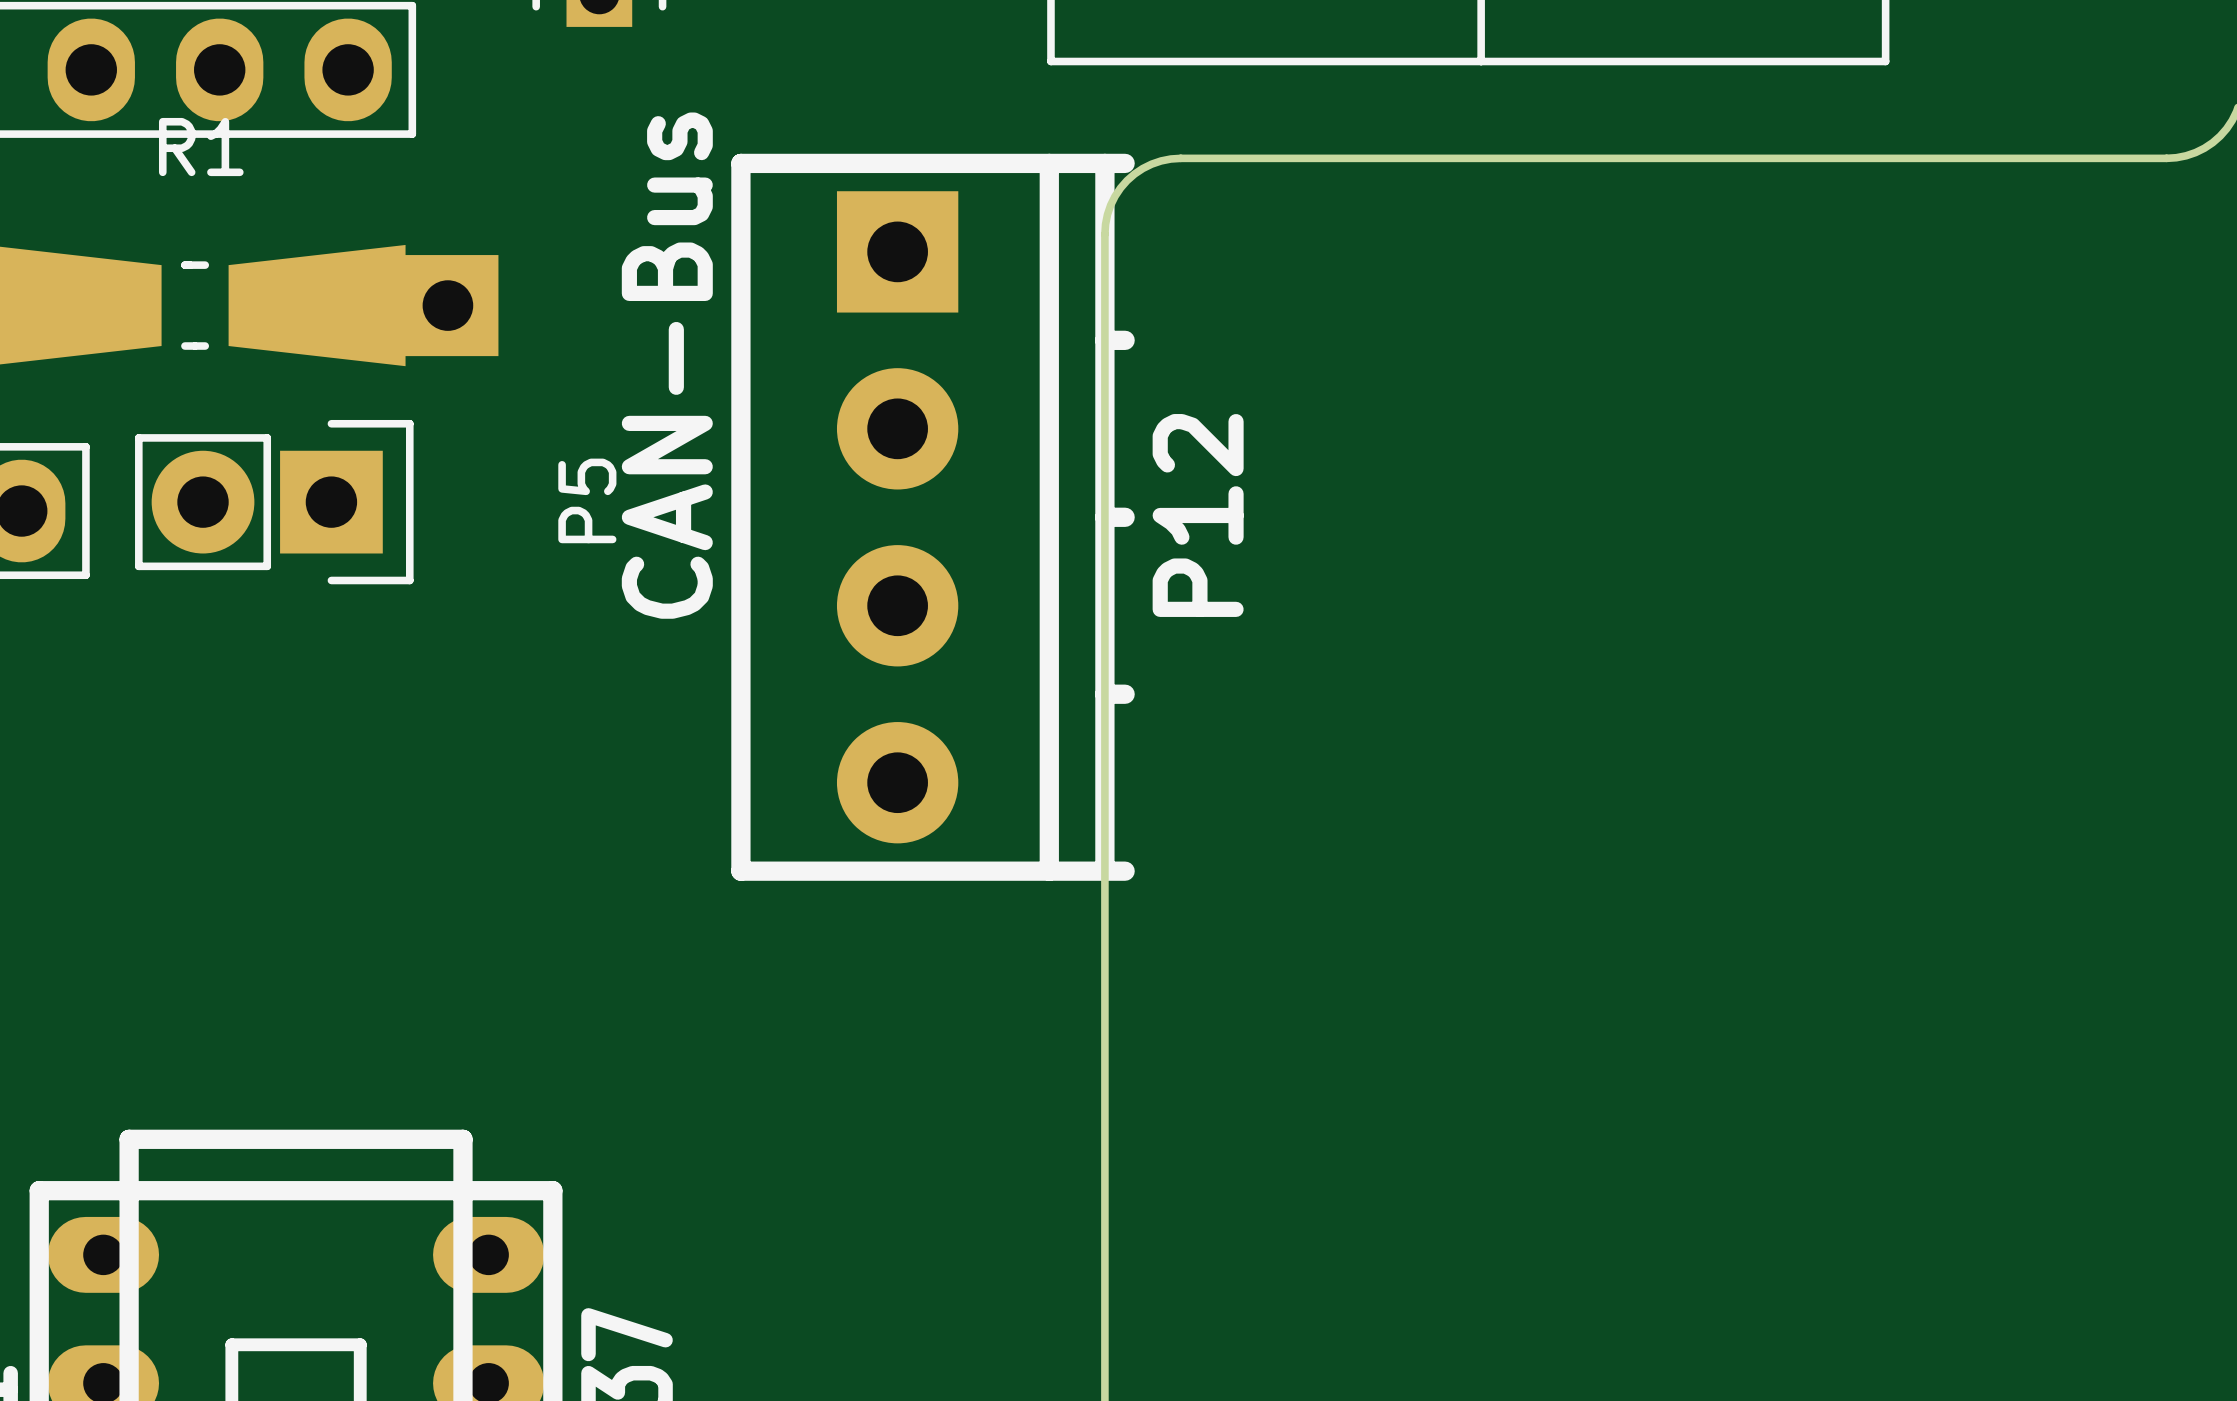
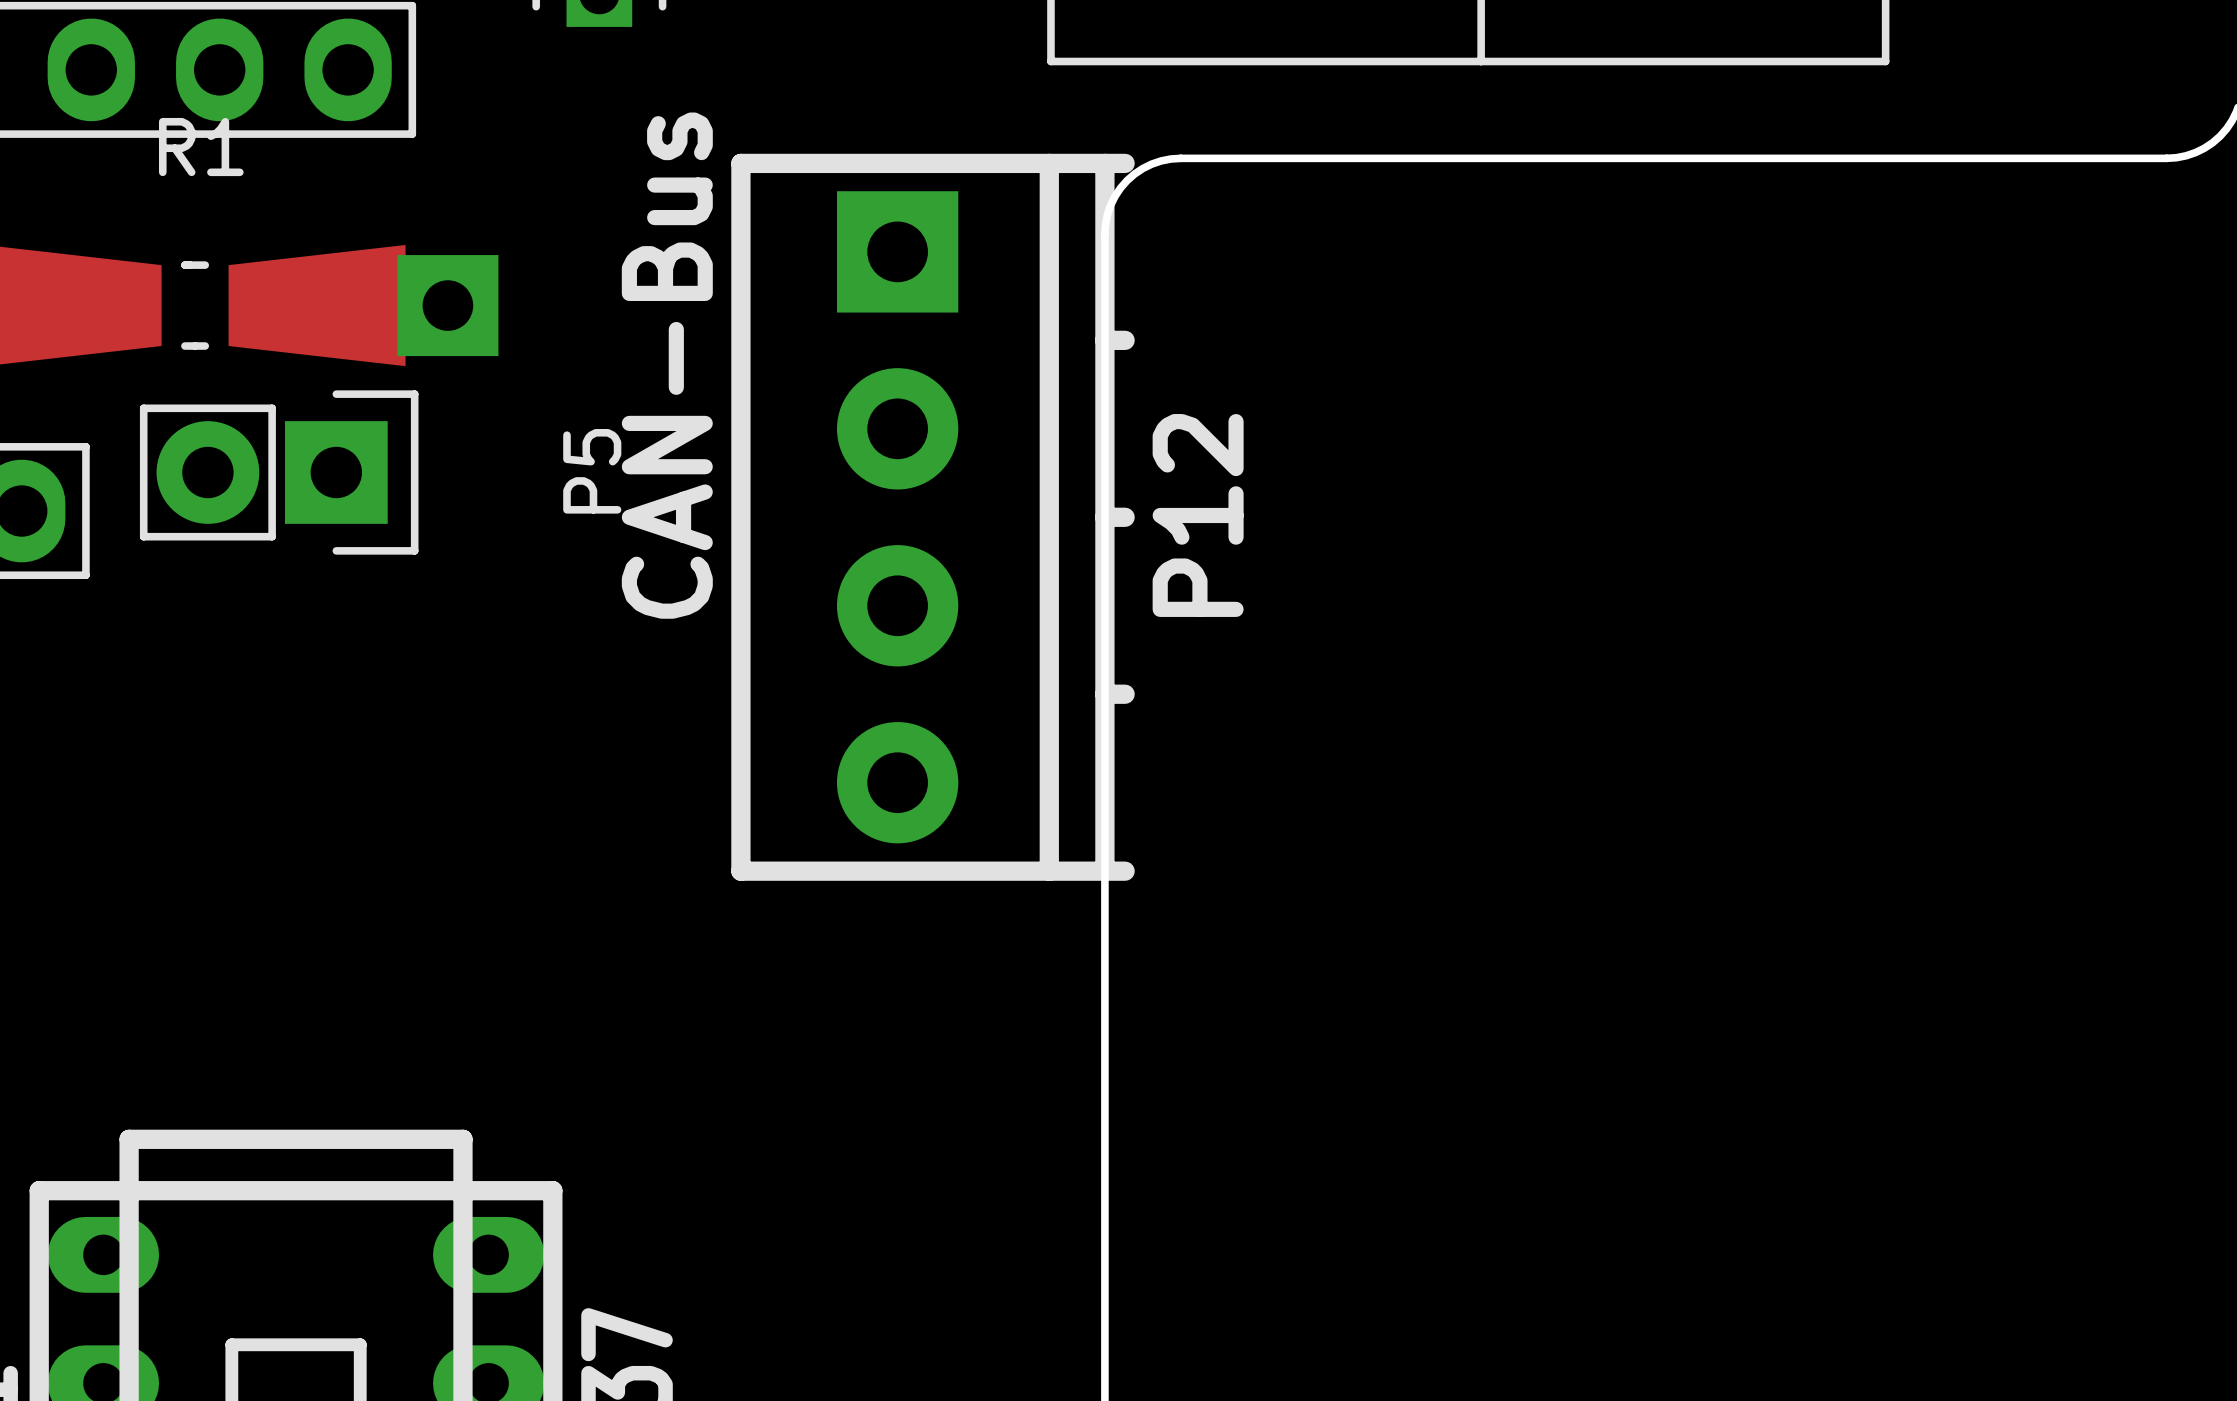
P5 position: (274, 502) -> (279, 472)

